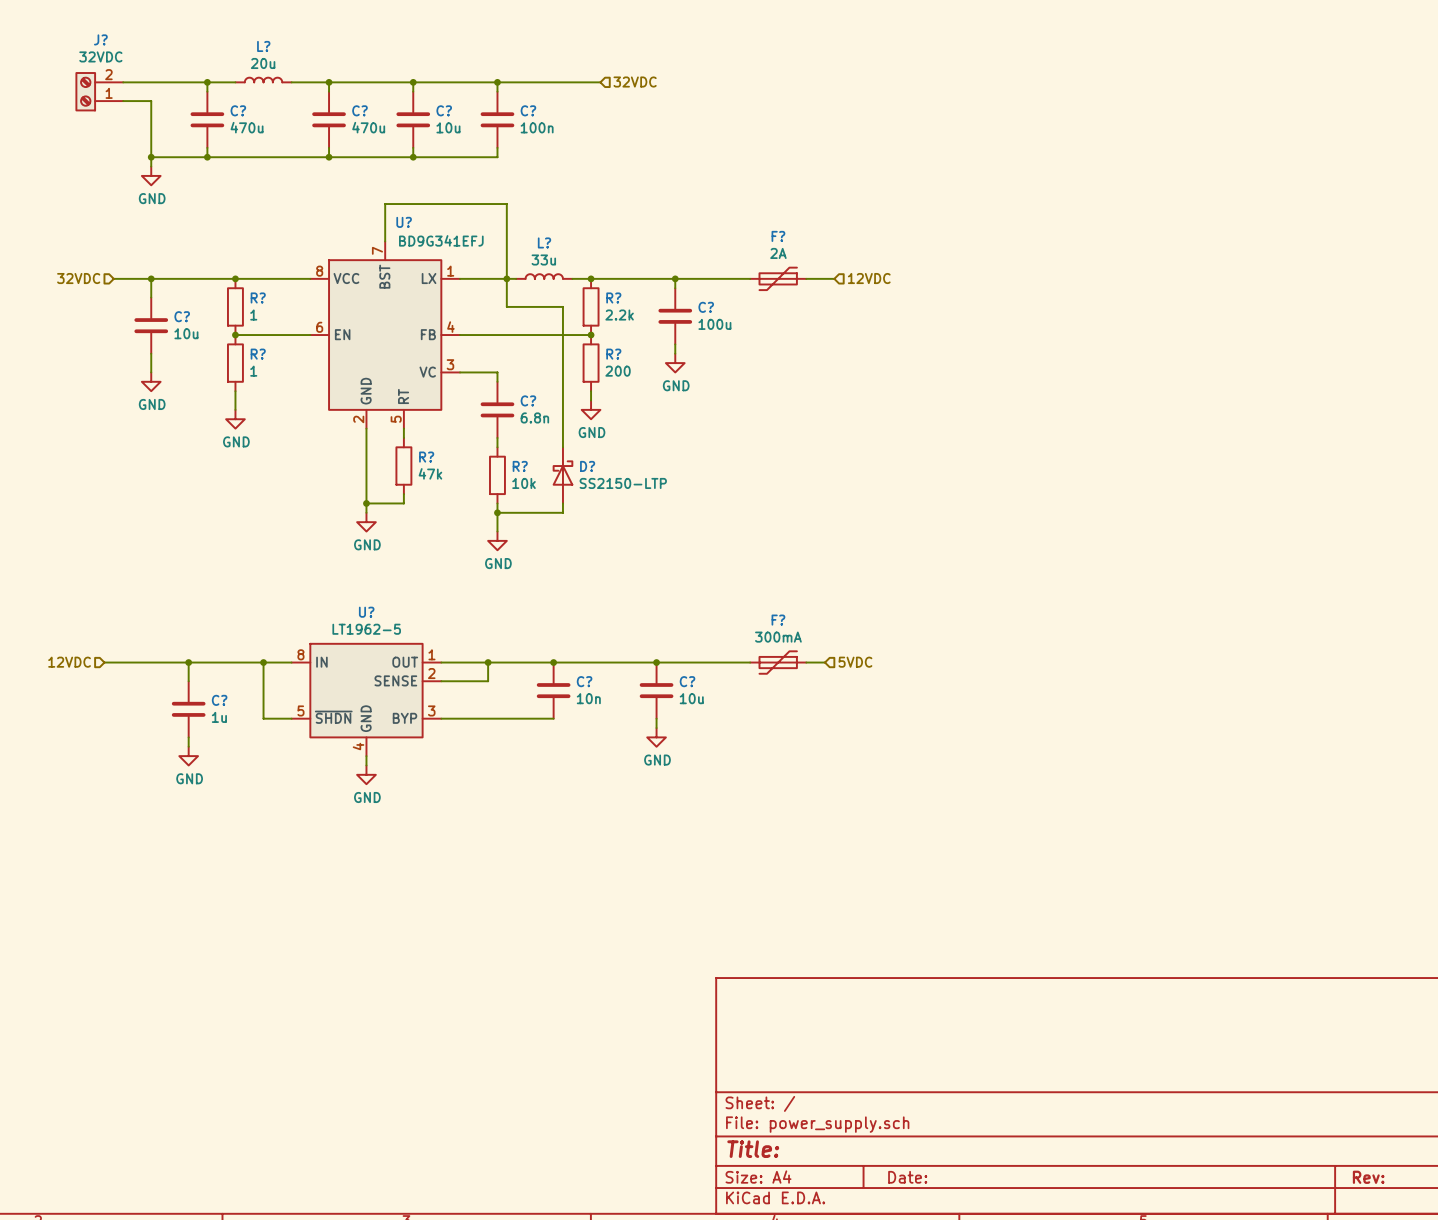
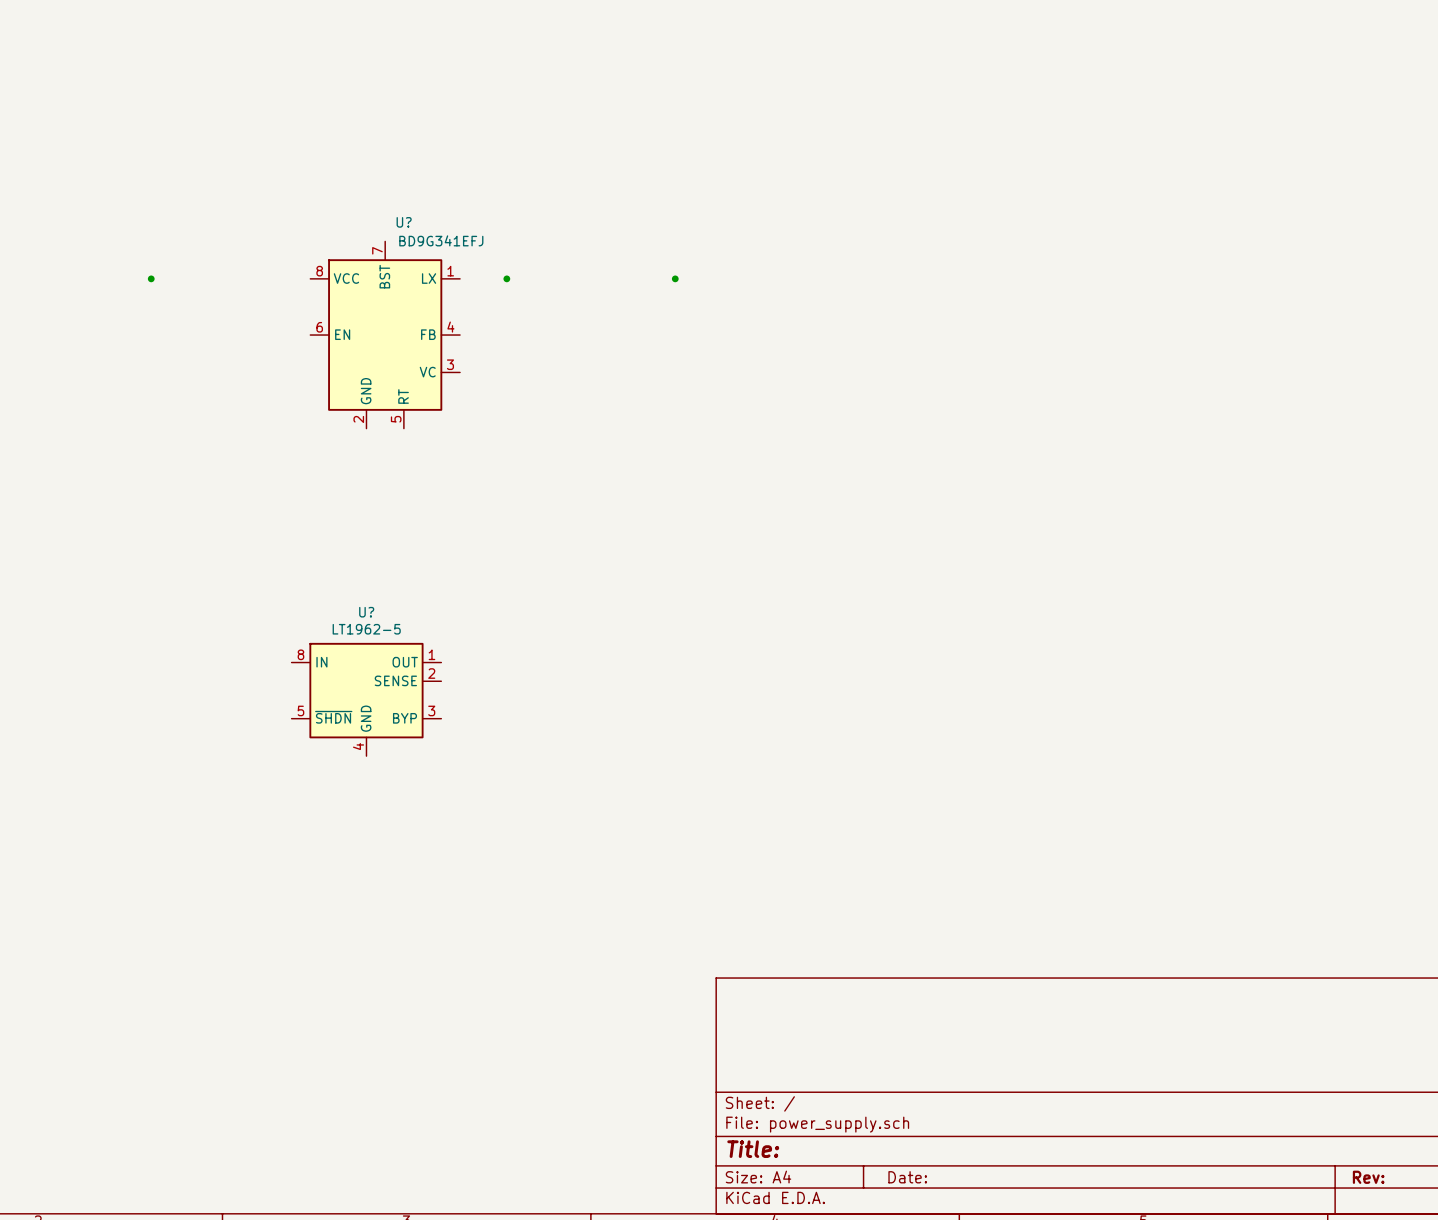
L?: 20u (263, 80) -> none
wire: (123, 82) (235, 82) -> none
wire: (207, 82) (207, 91) -> none
junction: (207, 82) -> none
wire: (291, 82) (600, 82) -> none
wire: (329, 82) (329, 91) -> none
junction: (329, 82) -> none
wire: (413, 82) (413, 91) -> none
junction: (413, 82) -> none
wire: (497, 82) (497, 91) -> none
junction: (497, 82) -> none
hierarchical label: 32VDC (635, 82) -> none
J?: 32VDC (99, 91) -> none
wire: (123, 101) (151, 101) (151, 166) -> none
C?: 470u (207, 119) -> none
C?: 470u (329, 119) -> none
C?: 10u (413, 119) -> none
C?: 100n (497, 119) -> none
wire: (207, 147) (207, 157) -> none
wire: (329, 147) (329, 157) -> none
wire: (413, 147) (413, 157) -> none
wire: (497, 147) (497, 157) (151, 157) -> none
junction: (151, 157) -> none
junction: (207, 157) -> none
junction: (329, 157) -> none
junction: (413, 157) -> none
power symbol: GND (151, 175) -> none
wire: (385, 241) (385, 204) (506, 204) (506, 306) (562, 306) (562, 447) -> none
L?: 33u (544, 276) -> none
hierarchical label: 32VDC (78, 278) -> none
wire: (113, 278) (310, 278) -> none
wire: (151, 278) (151, 297) -> none
junction: (235, 278) -> none
wire: (460, 278) (516, 278) -> none
wire: (572, 278) (750, 278) -> none
junction: (591, 278) -> none
wire: (675, 278) (675, 288) -> none
F?: 2A (778, 278) -> none
wire: (806, 278) (834, 278) -> none
hierarchical label: 12VDC (869, 278) -> none
R?: 1 (235, 306) -> none
R?: 2.2k (591, 306) -> none
C?: 100u (675, 316) -> none
C?: 10u (151, 325) -> none
wire: (235, 335) (310, 335) -> none
junction: (235, 335) -> none
wire: (460, 335) (591, 335) -> none
junction: (591, 335) -> none
wire: (675, 344) (675, 353) -> none
wire: (151, 353) (151, 372) -> none
R?: 1 (235, 363) -> none
R?: 200 (591, 363) -> none
power symbol: GND (675, 363) -> none
wire: (460, 372) (497, 372) (497, 381) -> none
power symbol: GND (151, 381) -> none
wire: (235, 391) (235, 409) -> none
wire: (591, 391) (591, 400) -> none
C?: 6.8n (497, 409) -> none
power symbol: GND (591, 409) -> none
power symbol: GND (235, 419) -> none
wire: (366, 428) (366, 512) -> none
wire: (403, 428) (403, 437) -> none
wire: (497, 437) (497, 447) -> none
R?: 47k (403, 466) -> none
R?: 10k (497, 475) -> none
D?: SS2150-LTP (562, 475) -> none
wire: (403, 494) (403, 503) (366, 503) -> none
junction: (366, 503) -> none
wire: (497, 503) (497, 531) -> none
wire: (562, 503) (562, 512) (497, 512) -> none
junction: (497, 512) -> none
power symbol: GND (366, 522) -> none
power symbol: GND (497, 540) -> none
hierarchical label: 12VDC (69, 662) -> none
wire: (104, 662) (291, 662) -> none
wire: (188, 662) (188, 681) -> none
junction: (188, 662) -> none
wire: (263, 662) (263, 718) (291, 718) -> none
junction: (263, 662) -> none
wire: (441, 662) (750, 662) -> none
wire: (488, 662) (488, 681) (441, 681) -> none
junction: (488, 662) -> none
junction: (553, 662) -> none
junction: (656, 662) -> none
F?: 300mA (778, 662) -> none
wire: (806, 662) (824, 662) -> none
hierarchical label: 5VDC (855, 662) -> none
C?: 10n (553, 690) -> none
C?: 10u (656, 690) -> none
C?: 1u (188, 709) -> none
wire: (441, 718) (553, 718) -> none
wire: (656, 718) (656, 728) -> none
wire: (188, 737) (188, 746) -> none
power symbol: GND (656, 737) -> none
power symbol: GND (188, 756) -> none
wire: (366, 756) (366, 765) -> none
power symbol: GND (366, 774) -> none

